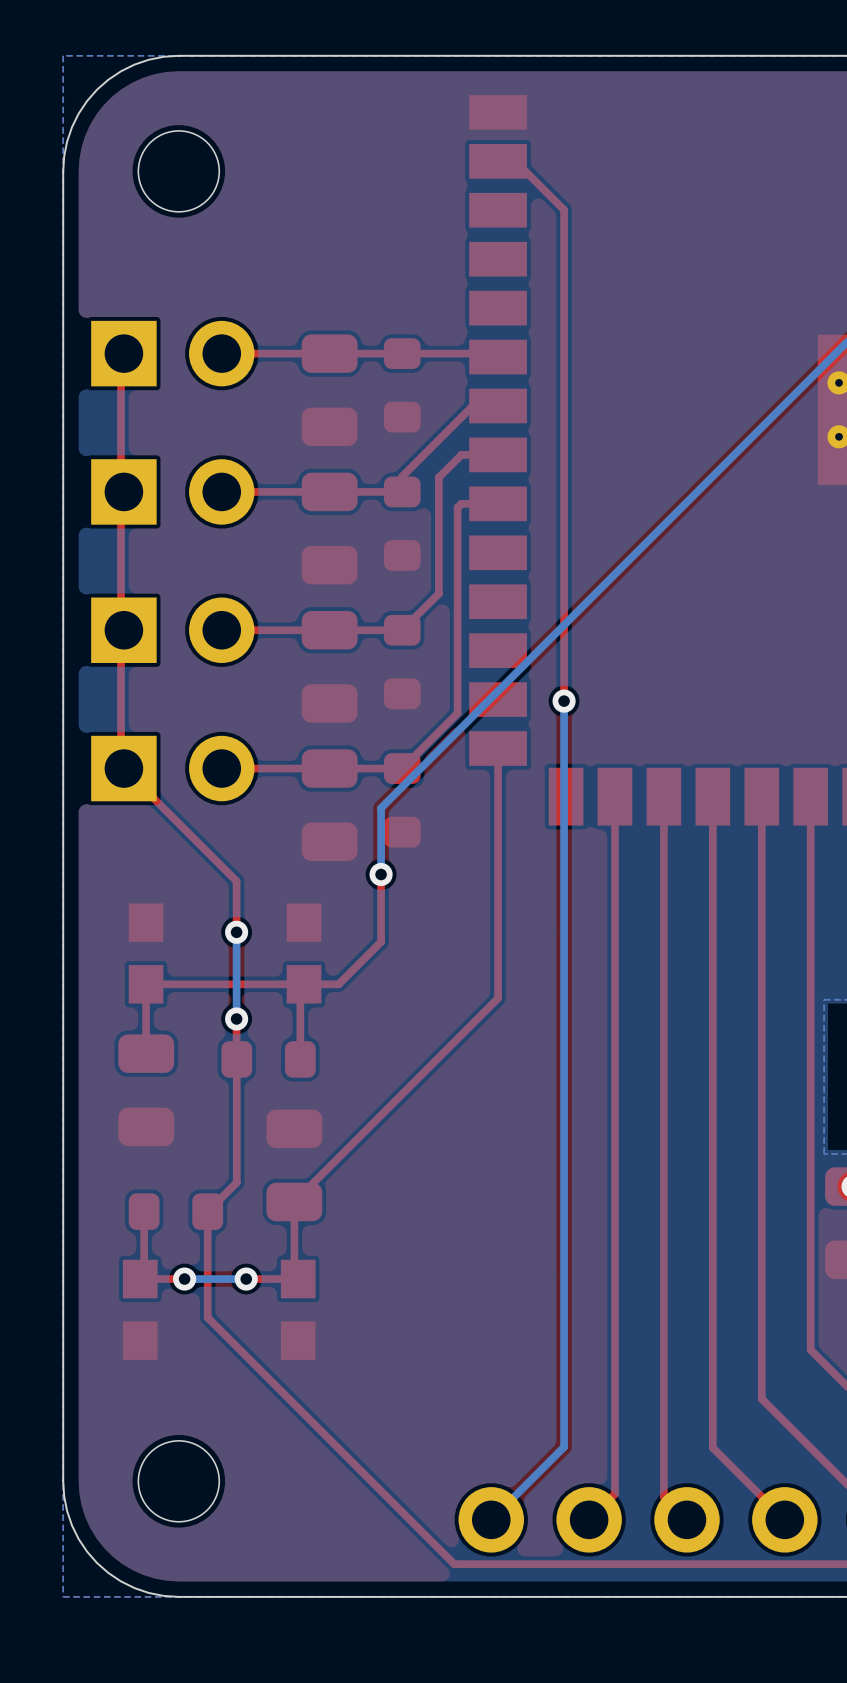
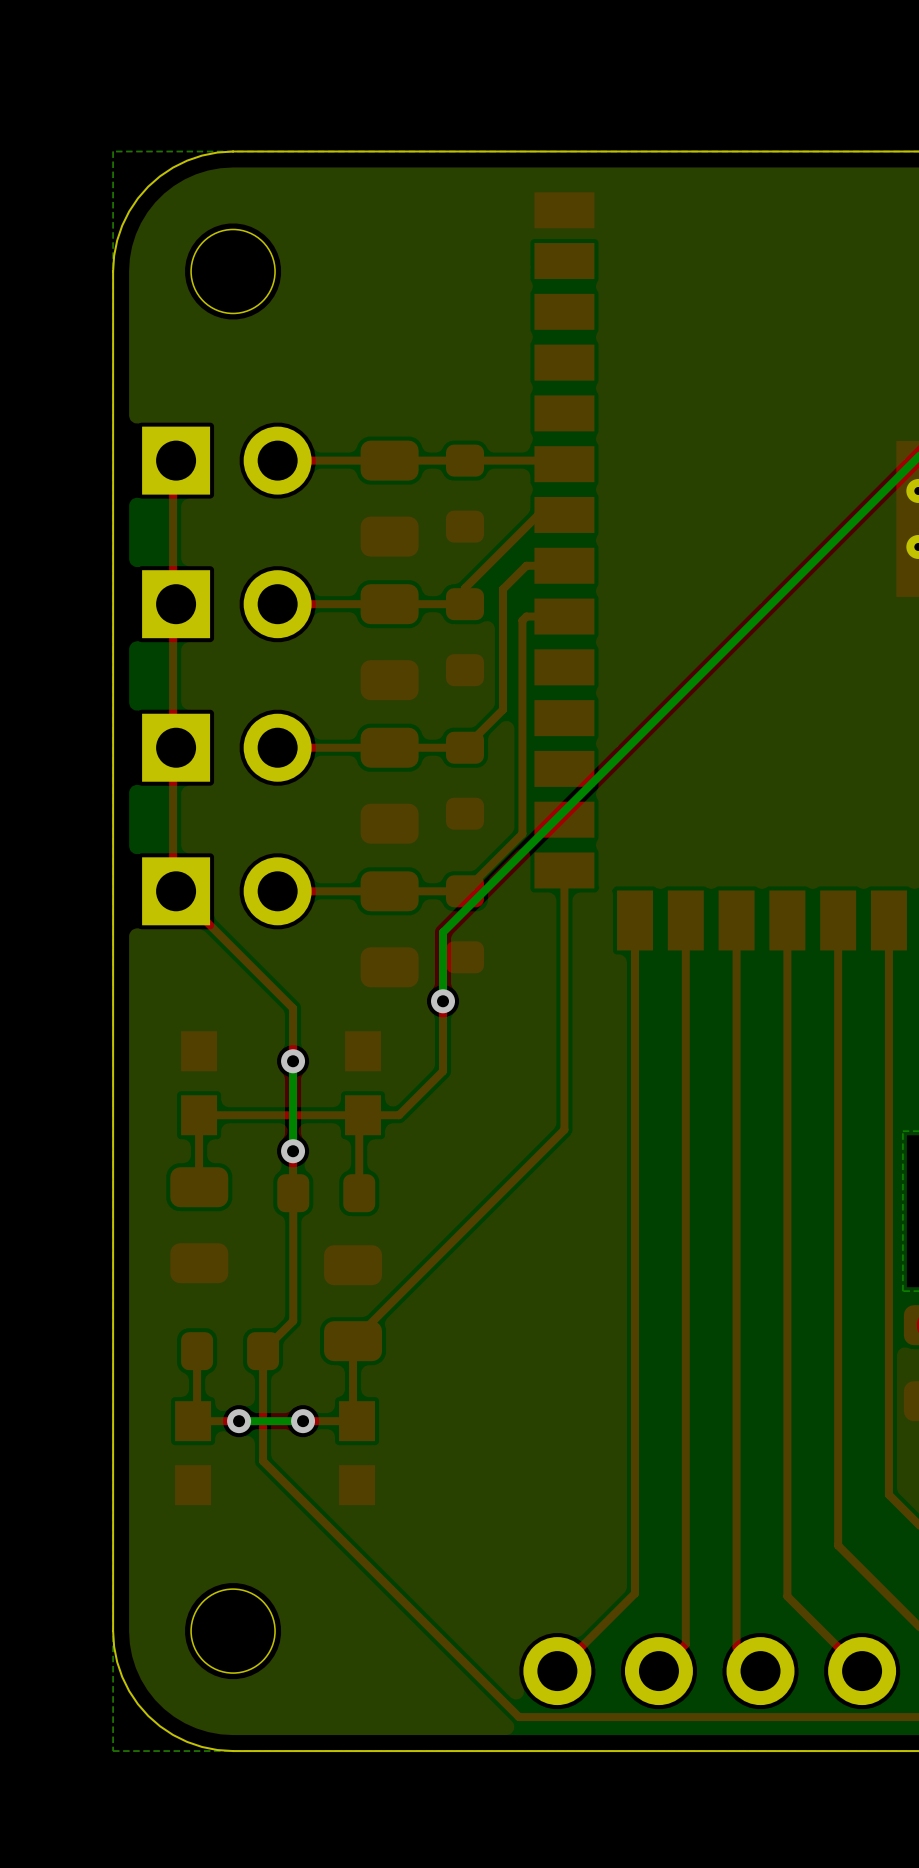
top track: (498, 161) (515, 161) (564, 209) (564, 701) -> none
bottom track: (564, 701) (564, 1447) (491, 1519) -> none
via: (564, 701) -> none
top track: none -> (635, 920) (635, 1593) (557, 1671)

